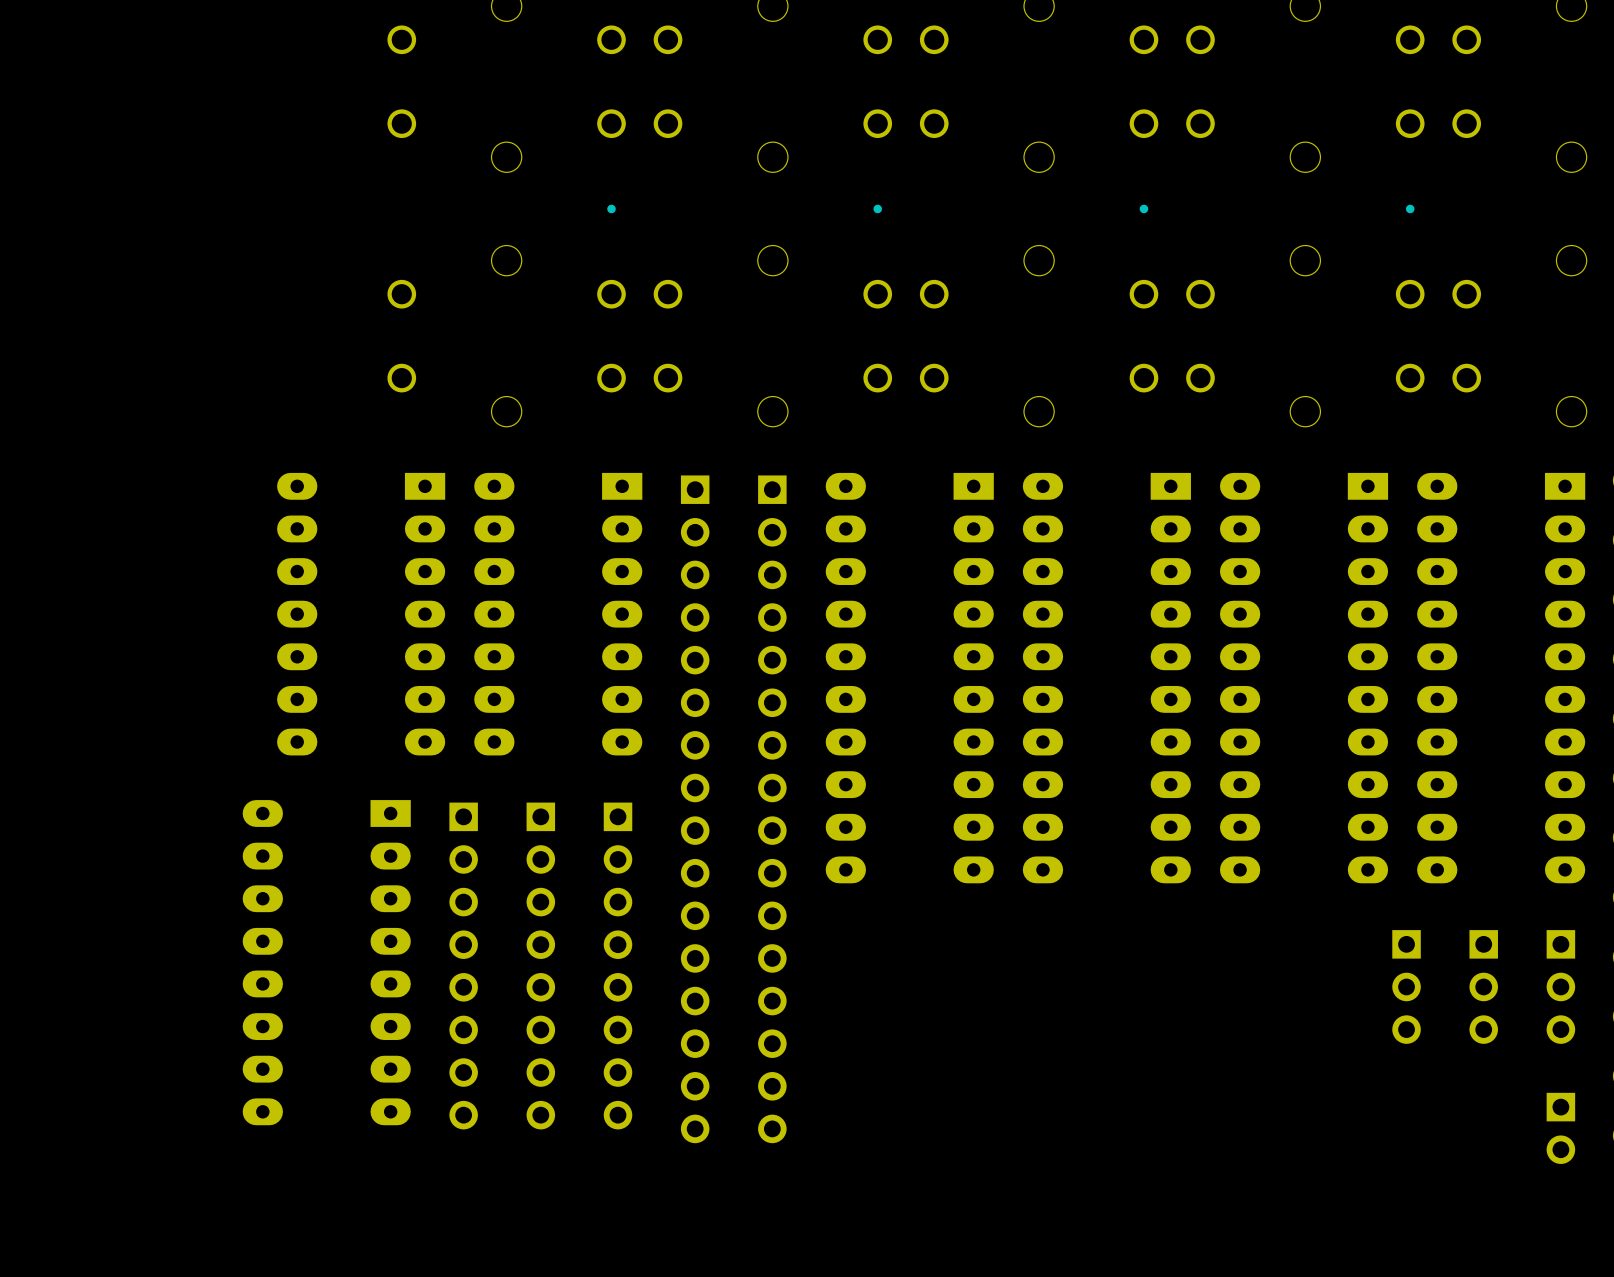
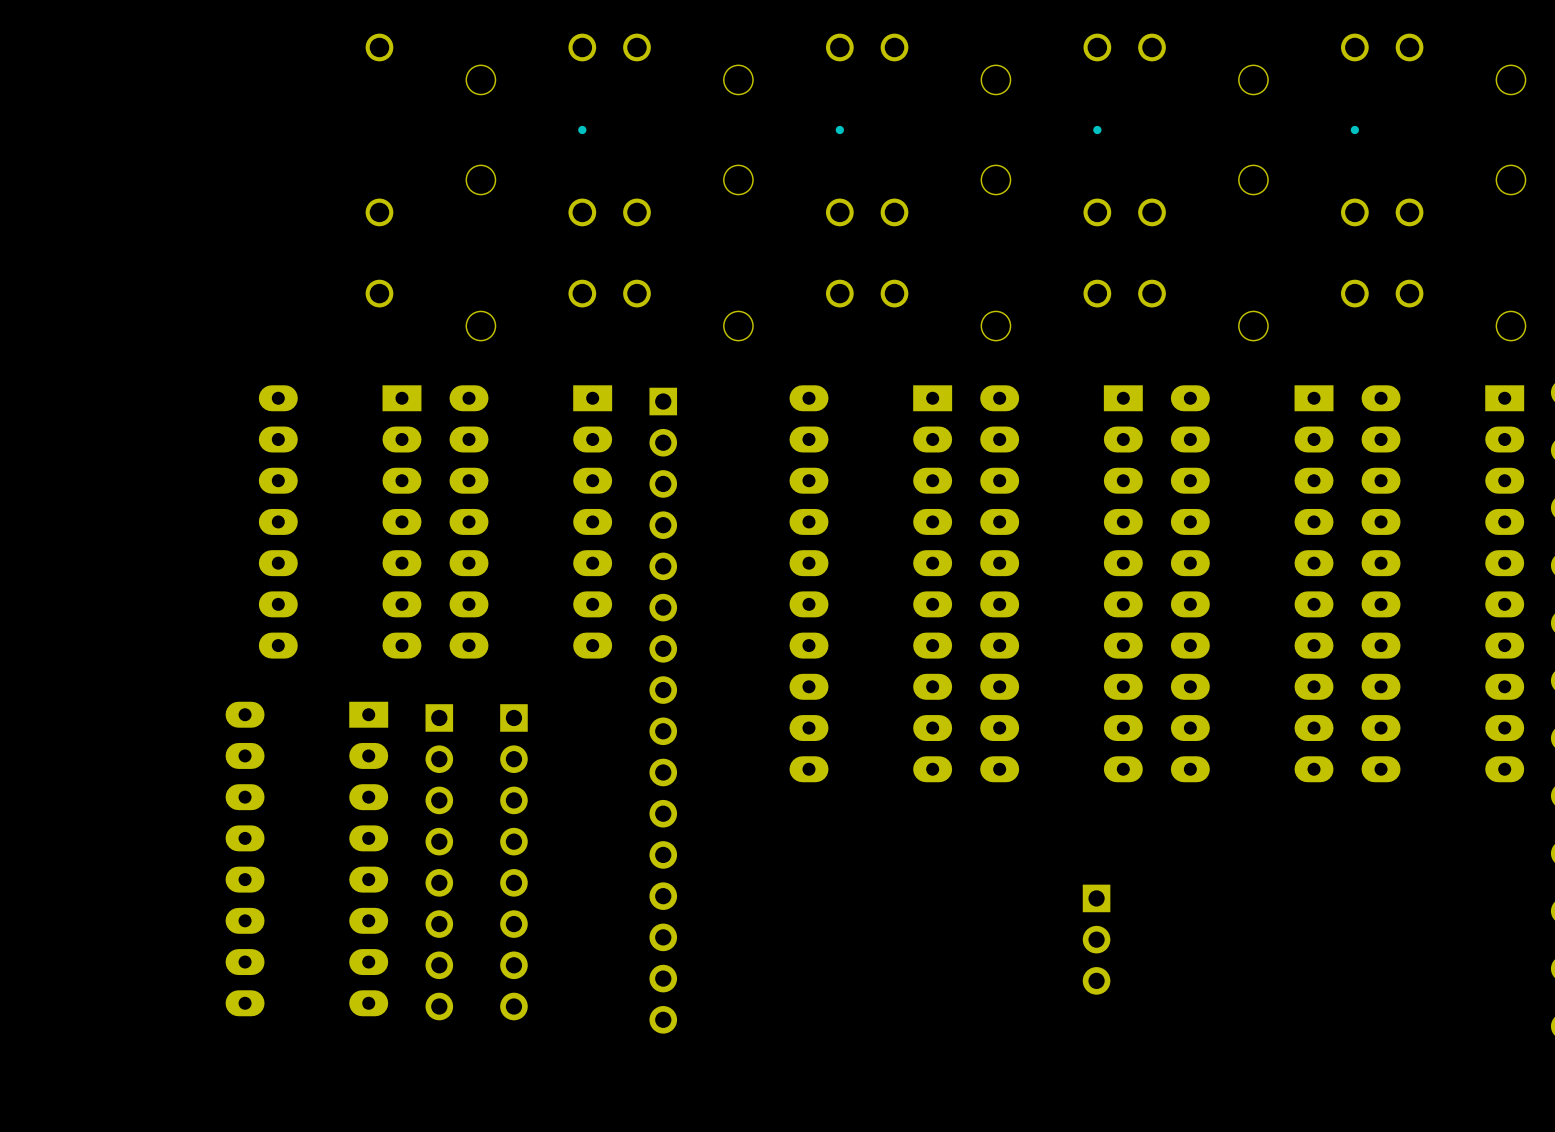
part: (772, 809) -> none
part: (618, 966) -> none
part: (1406, 986) -> none
part: (1483, 986) -> none
part: (1560, 986) -> none
part: none -> (1096, 939)
part: (1560, 1128) -> none

